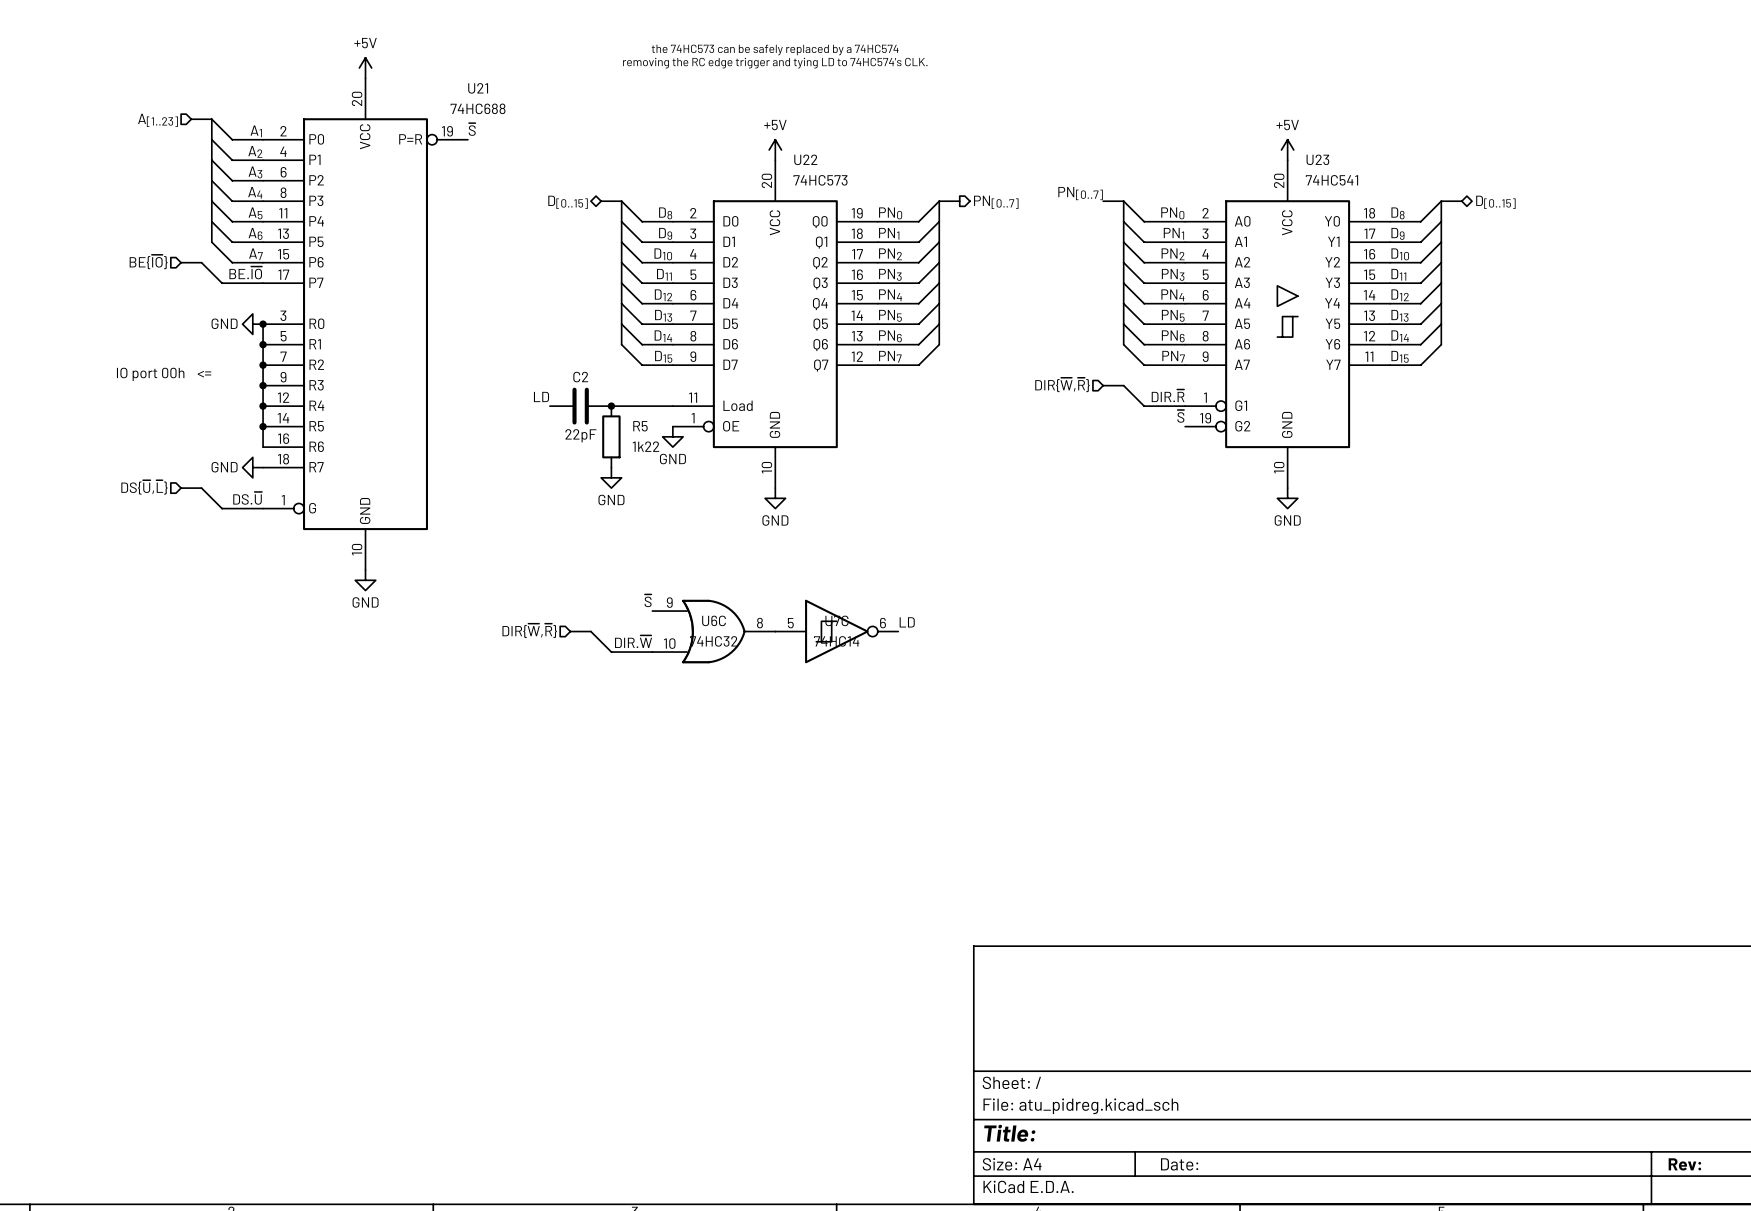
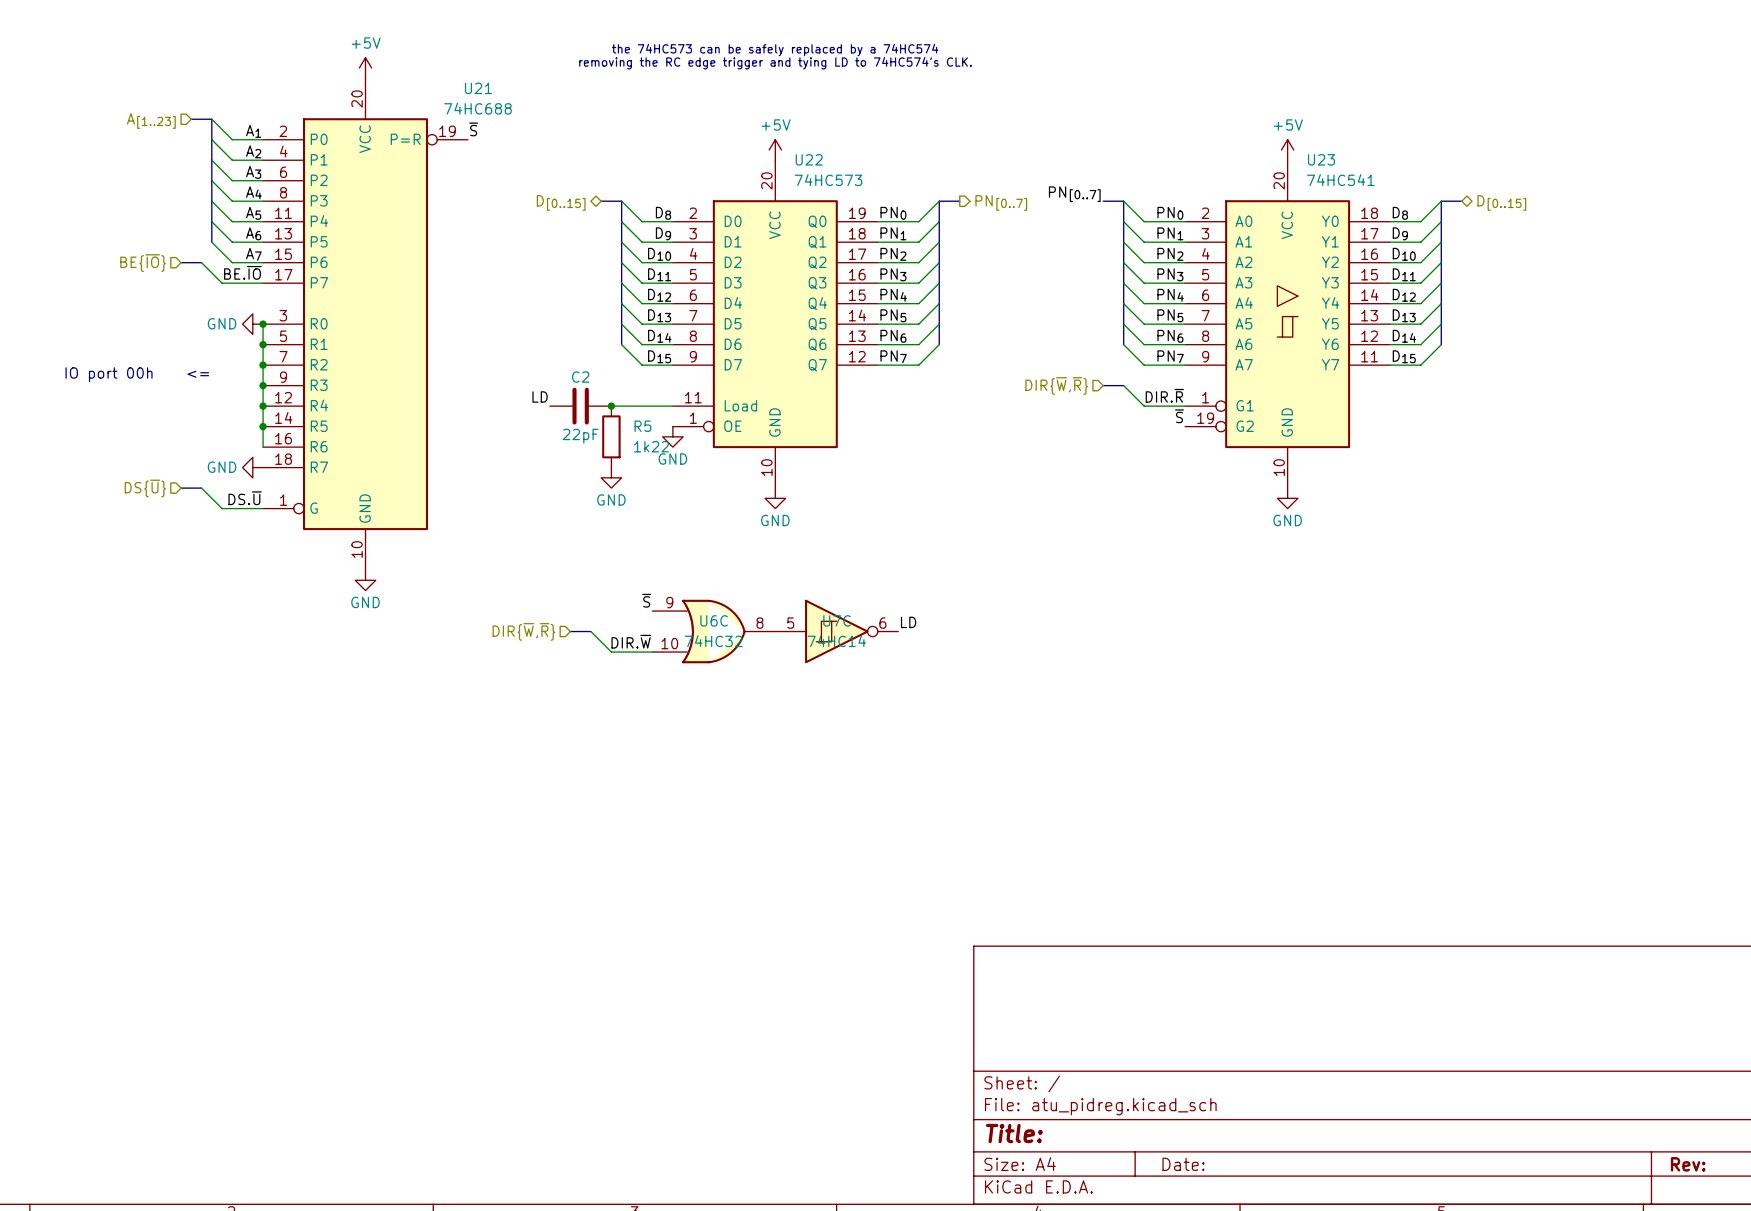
hierarchical label: DS{~{U},~{L}} (144, 487) -> DS{~{U}} (145, 488)

